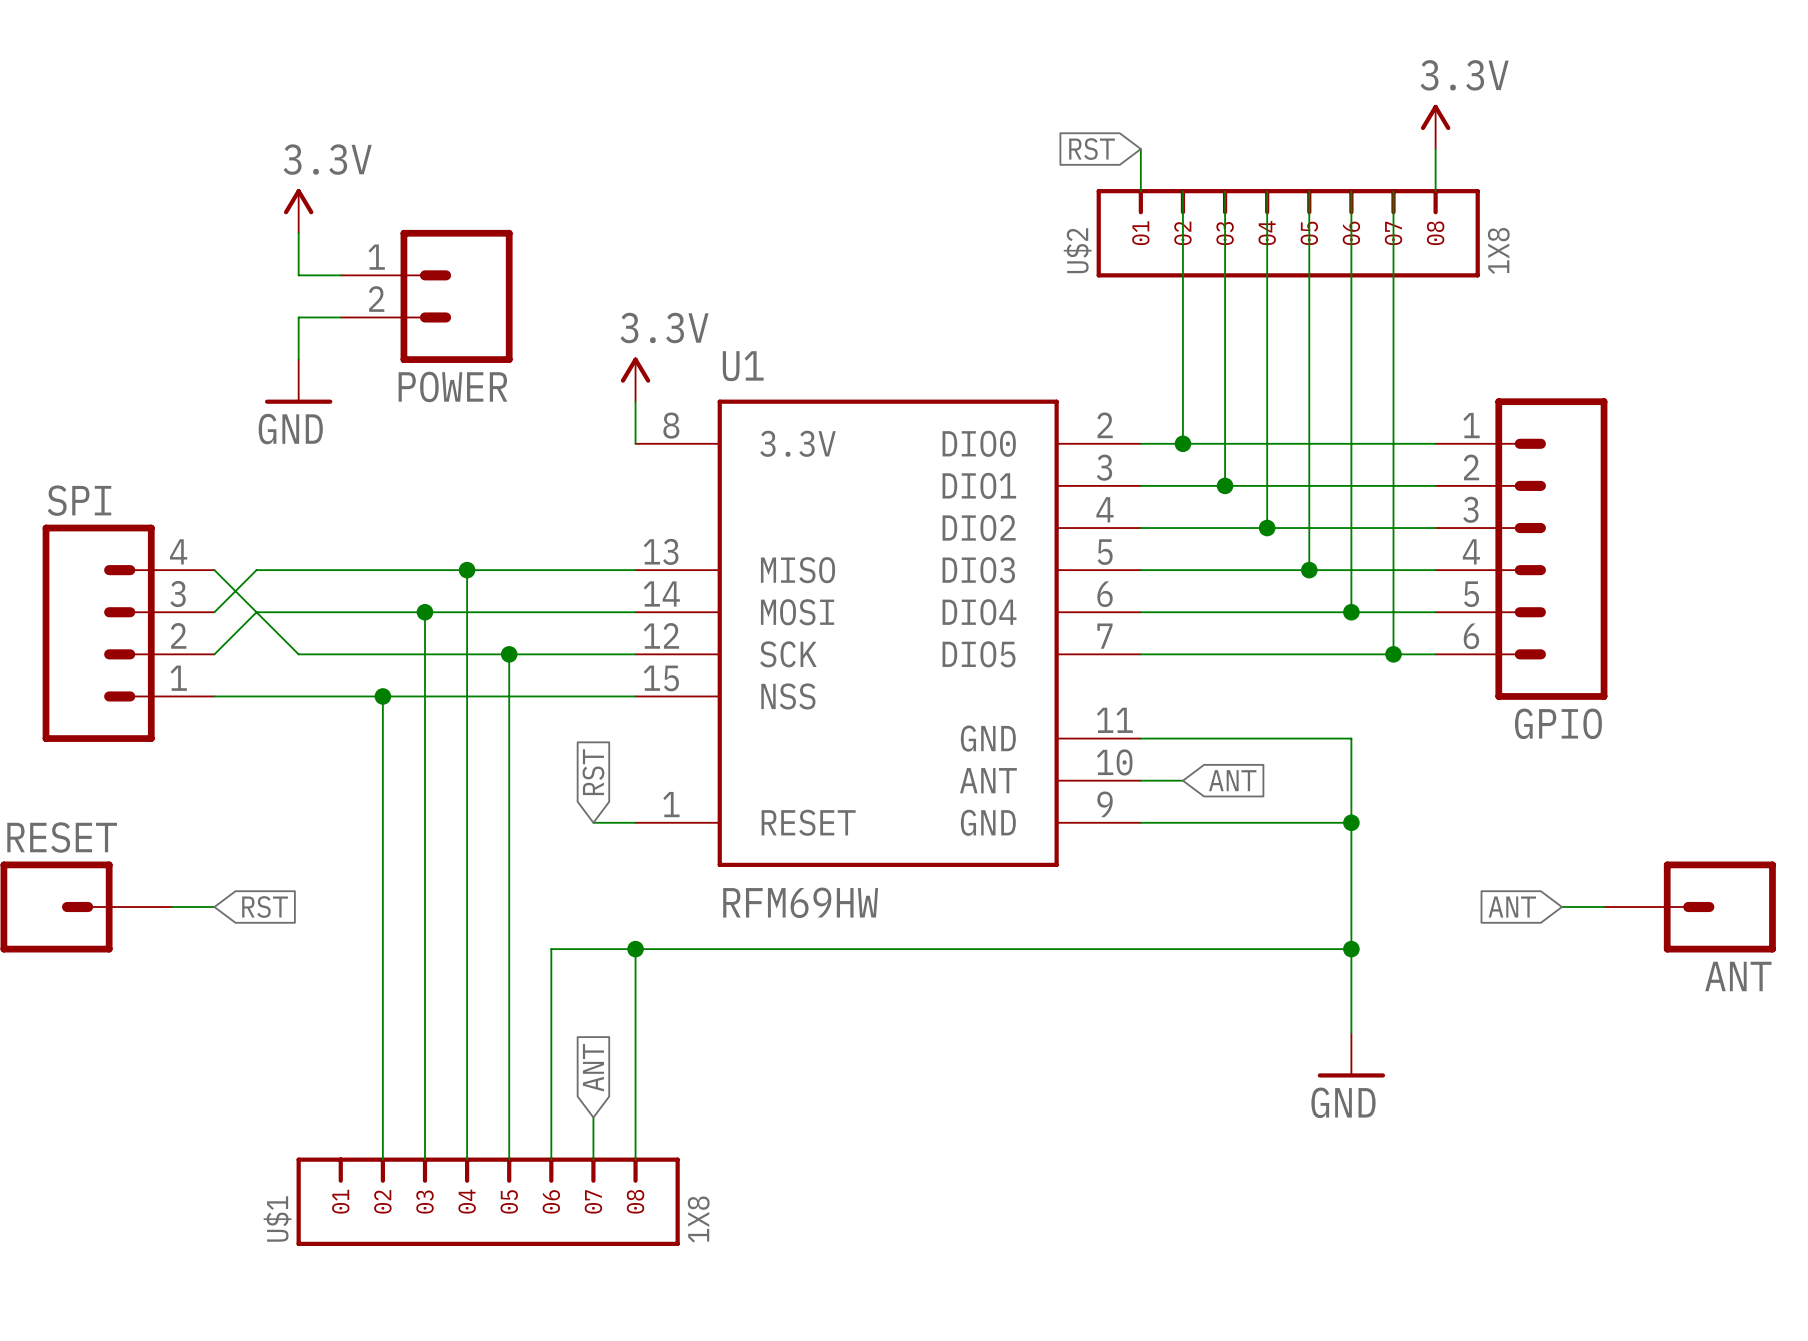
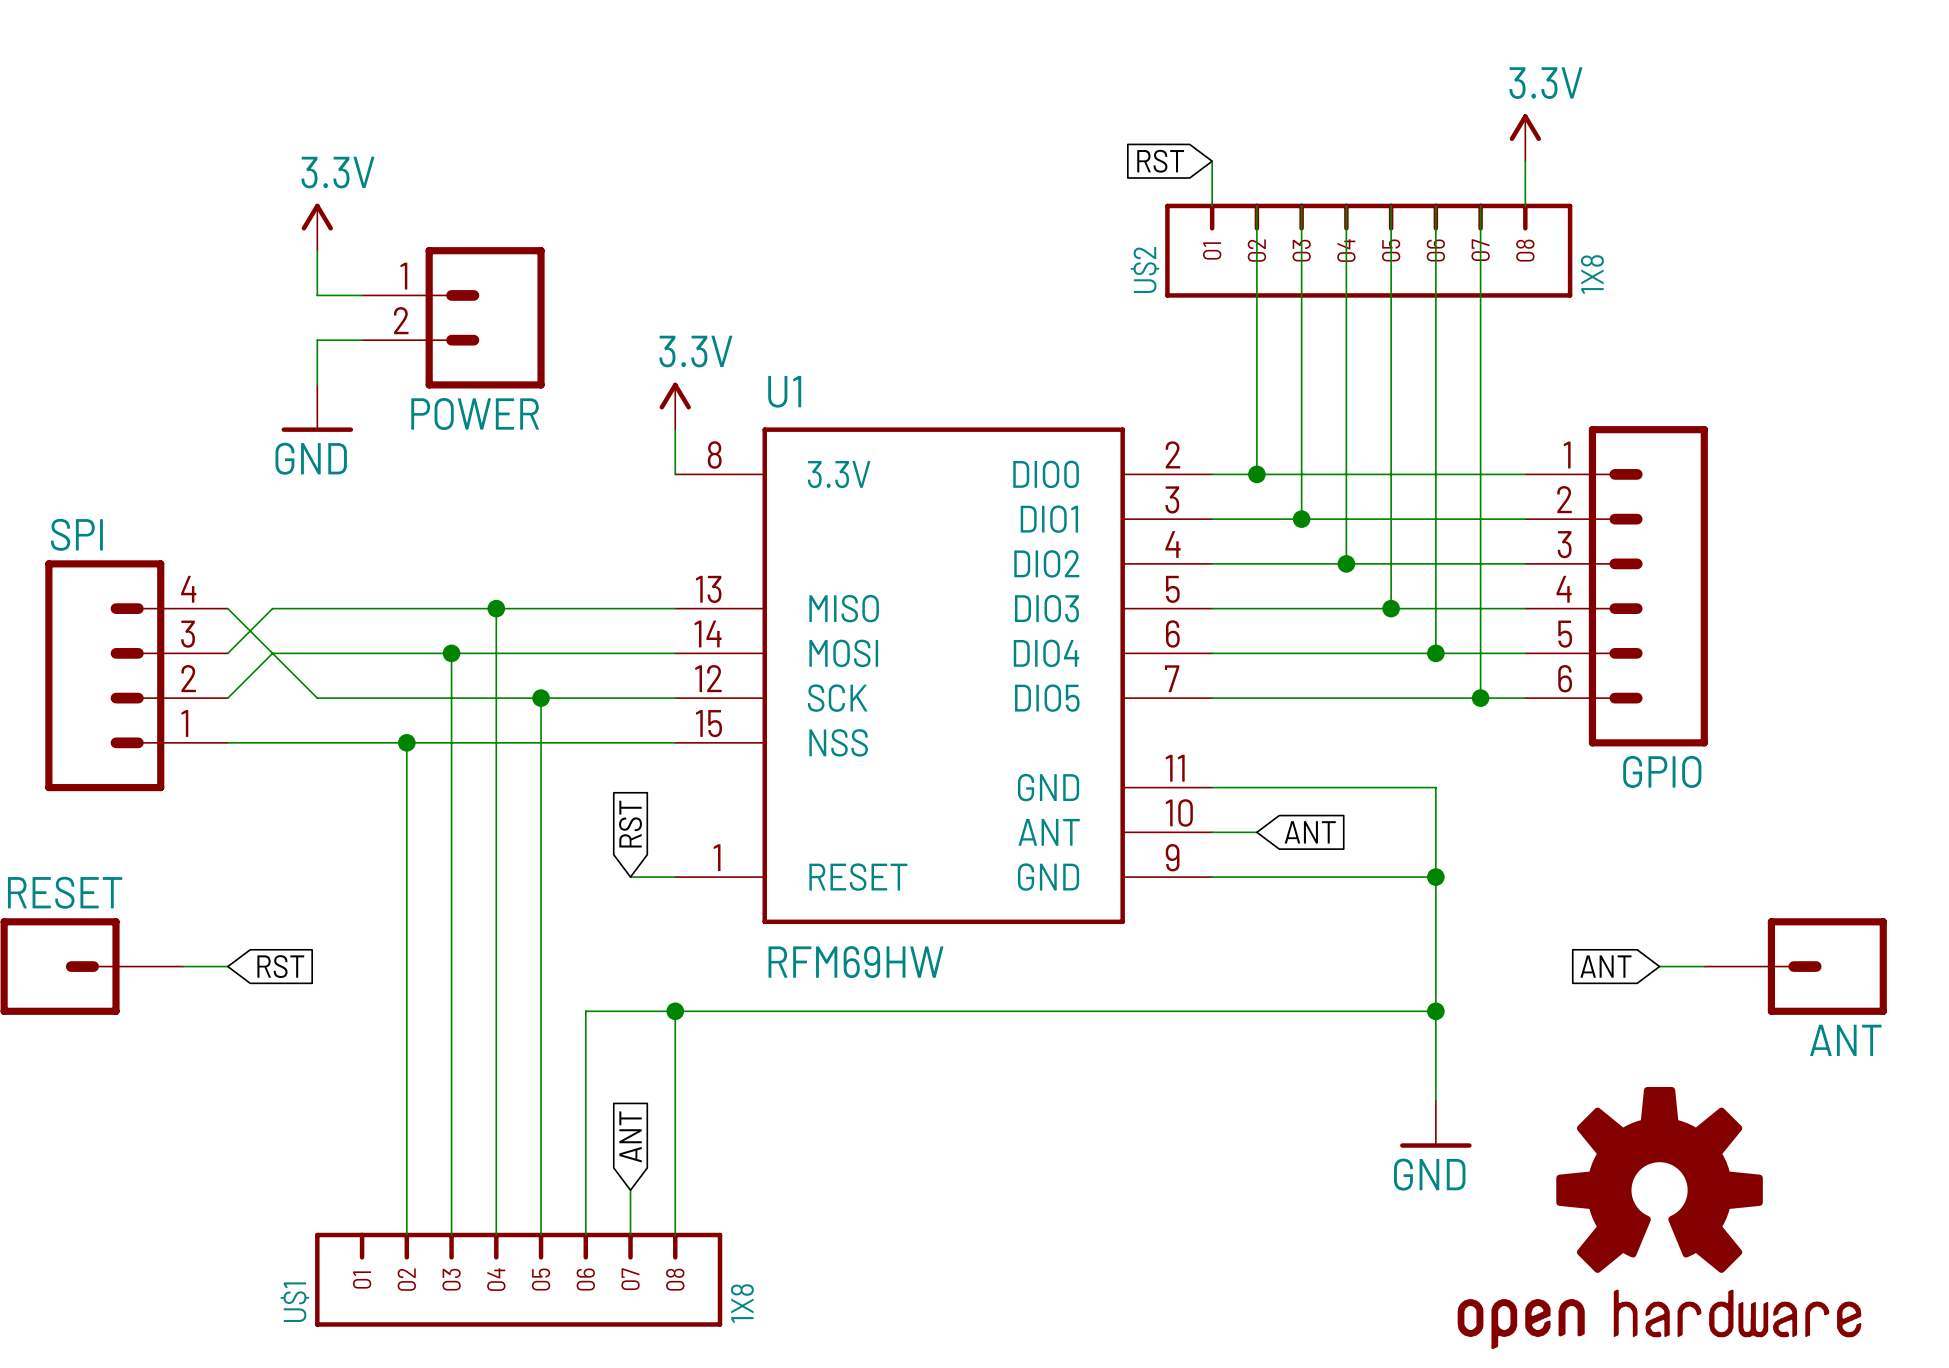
part: none -> (1659, 1217)

